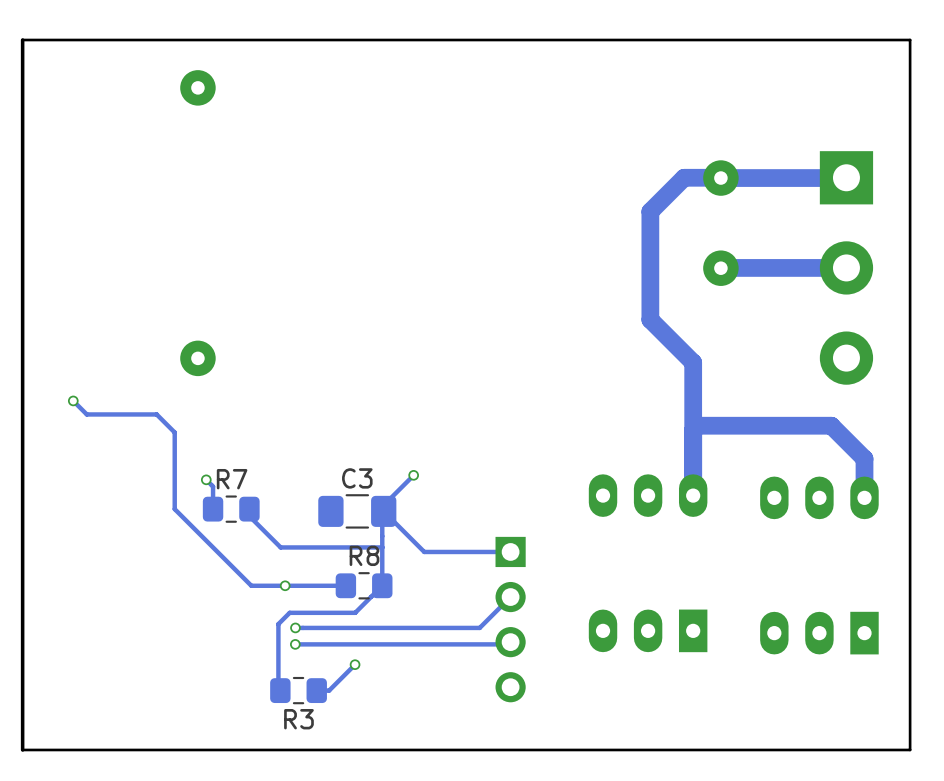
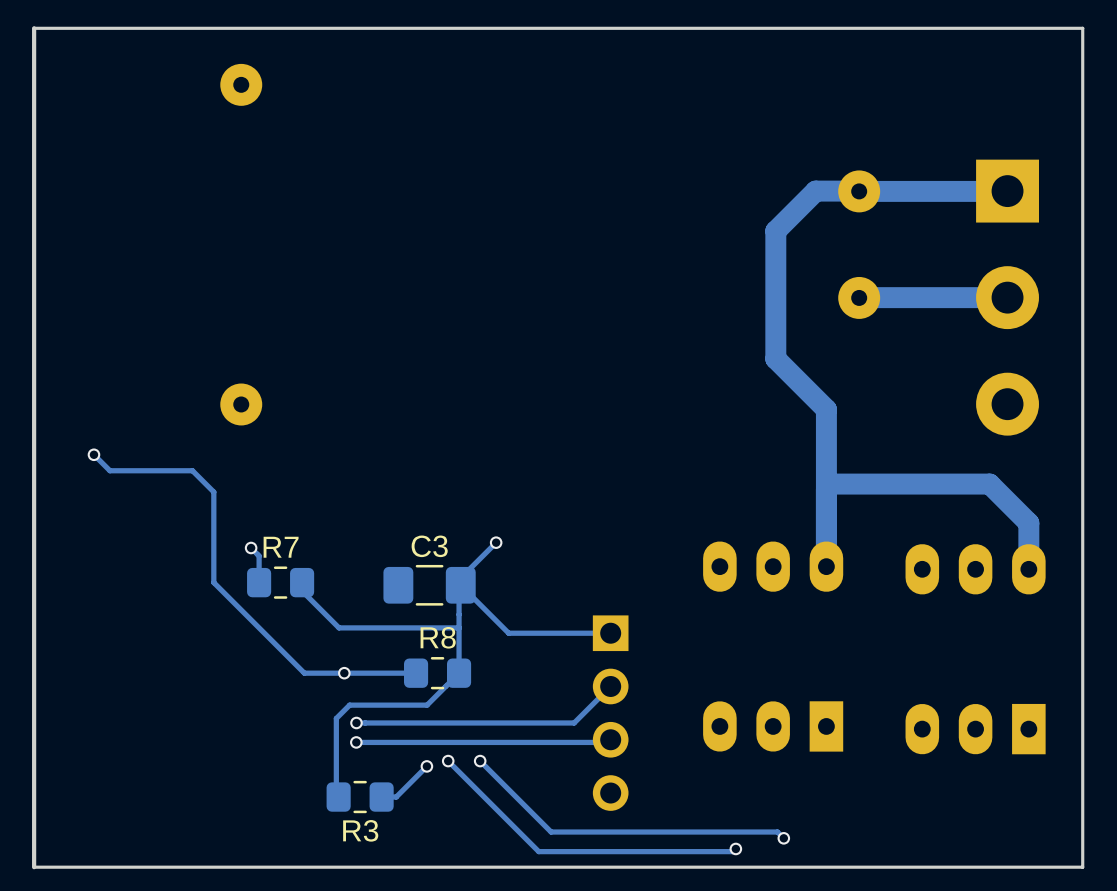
track: none -> (448, 761) (538, 851) (733, 851) (735, 848)
via: none -> (448, 761)
track: none -> (480, 761) (551, 832) (777, 832) (783, 838)
via: none -> (480, 761)
via: none -> (783, 838)
via: none -> (735, 848)

